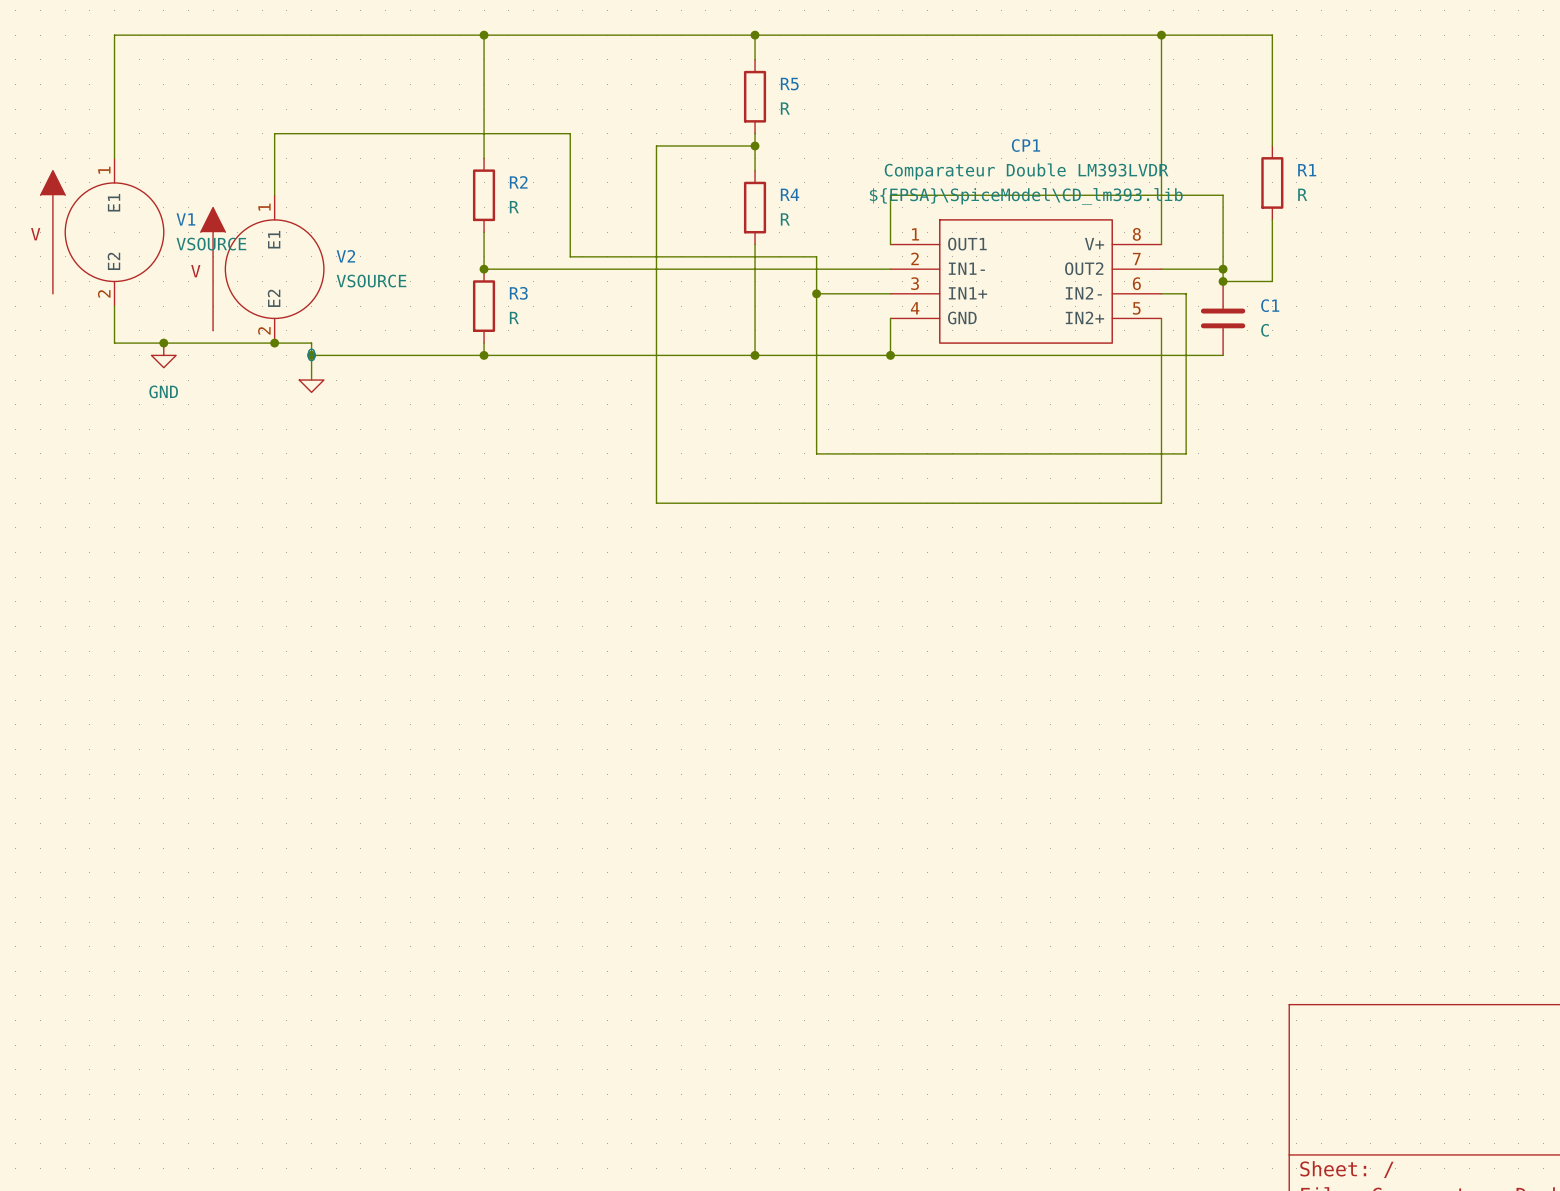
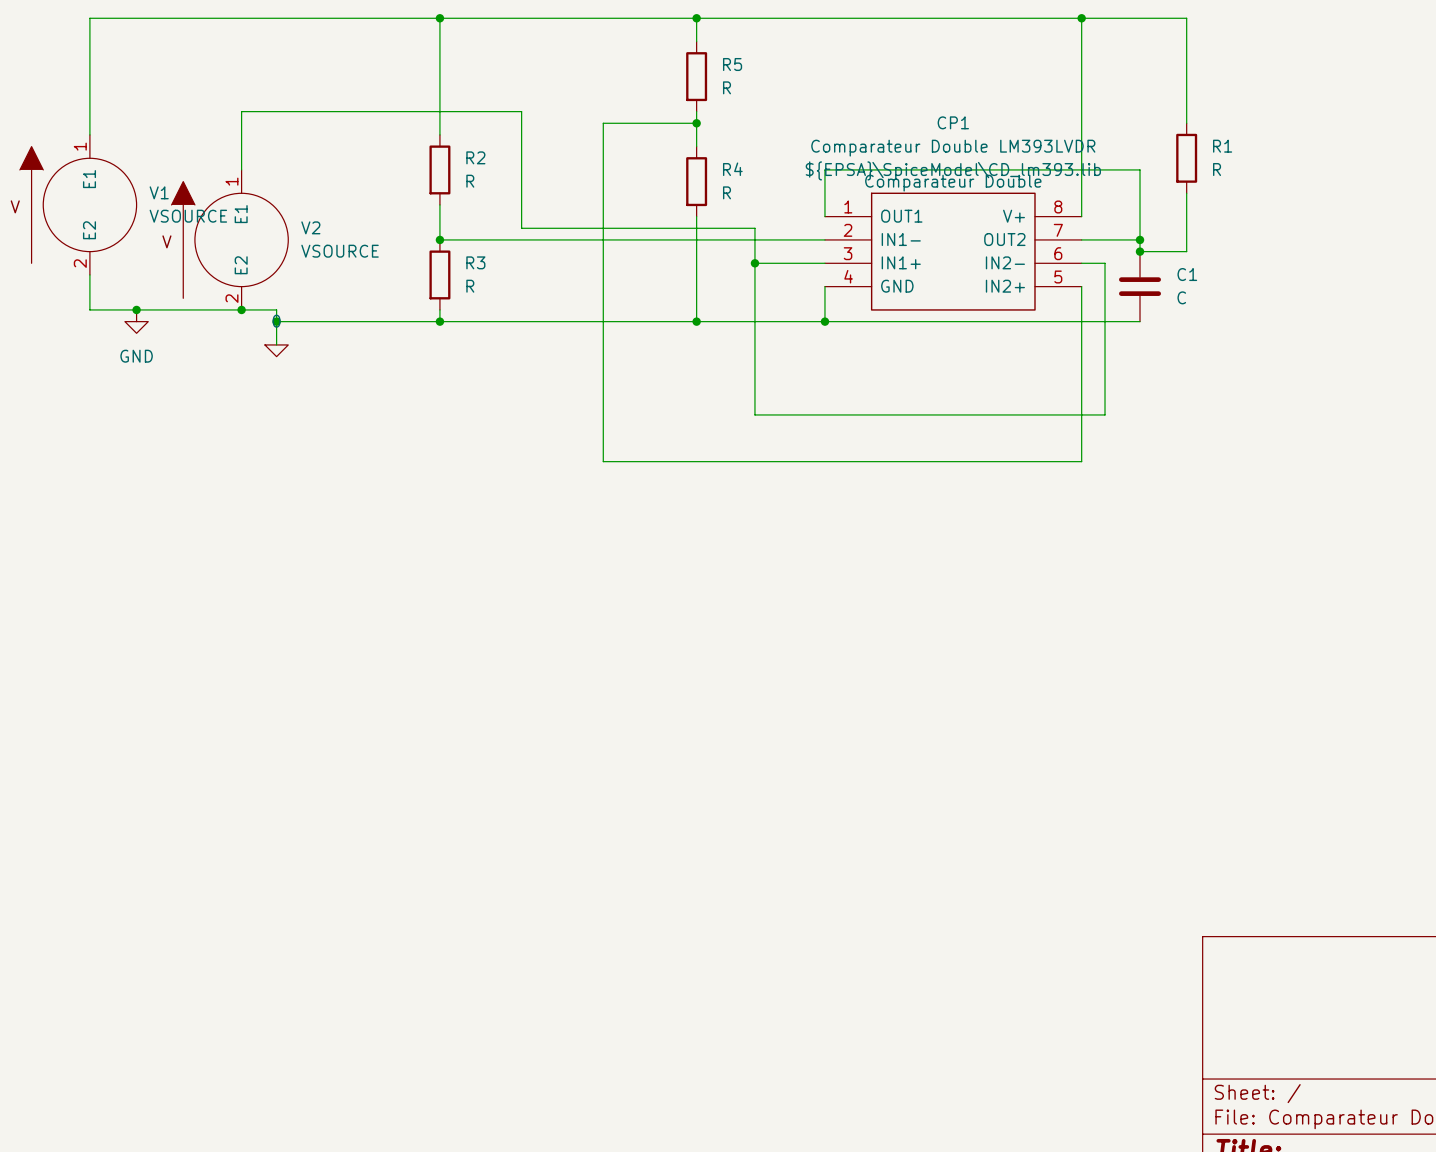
CP1 text: none -> Comparateur Double (953, 183)

